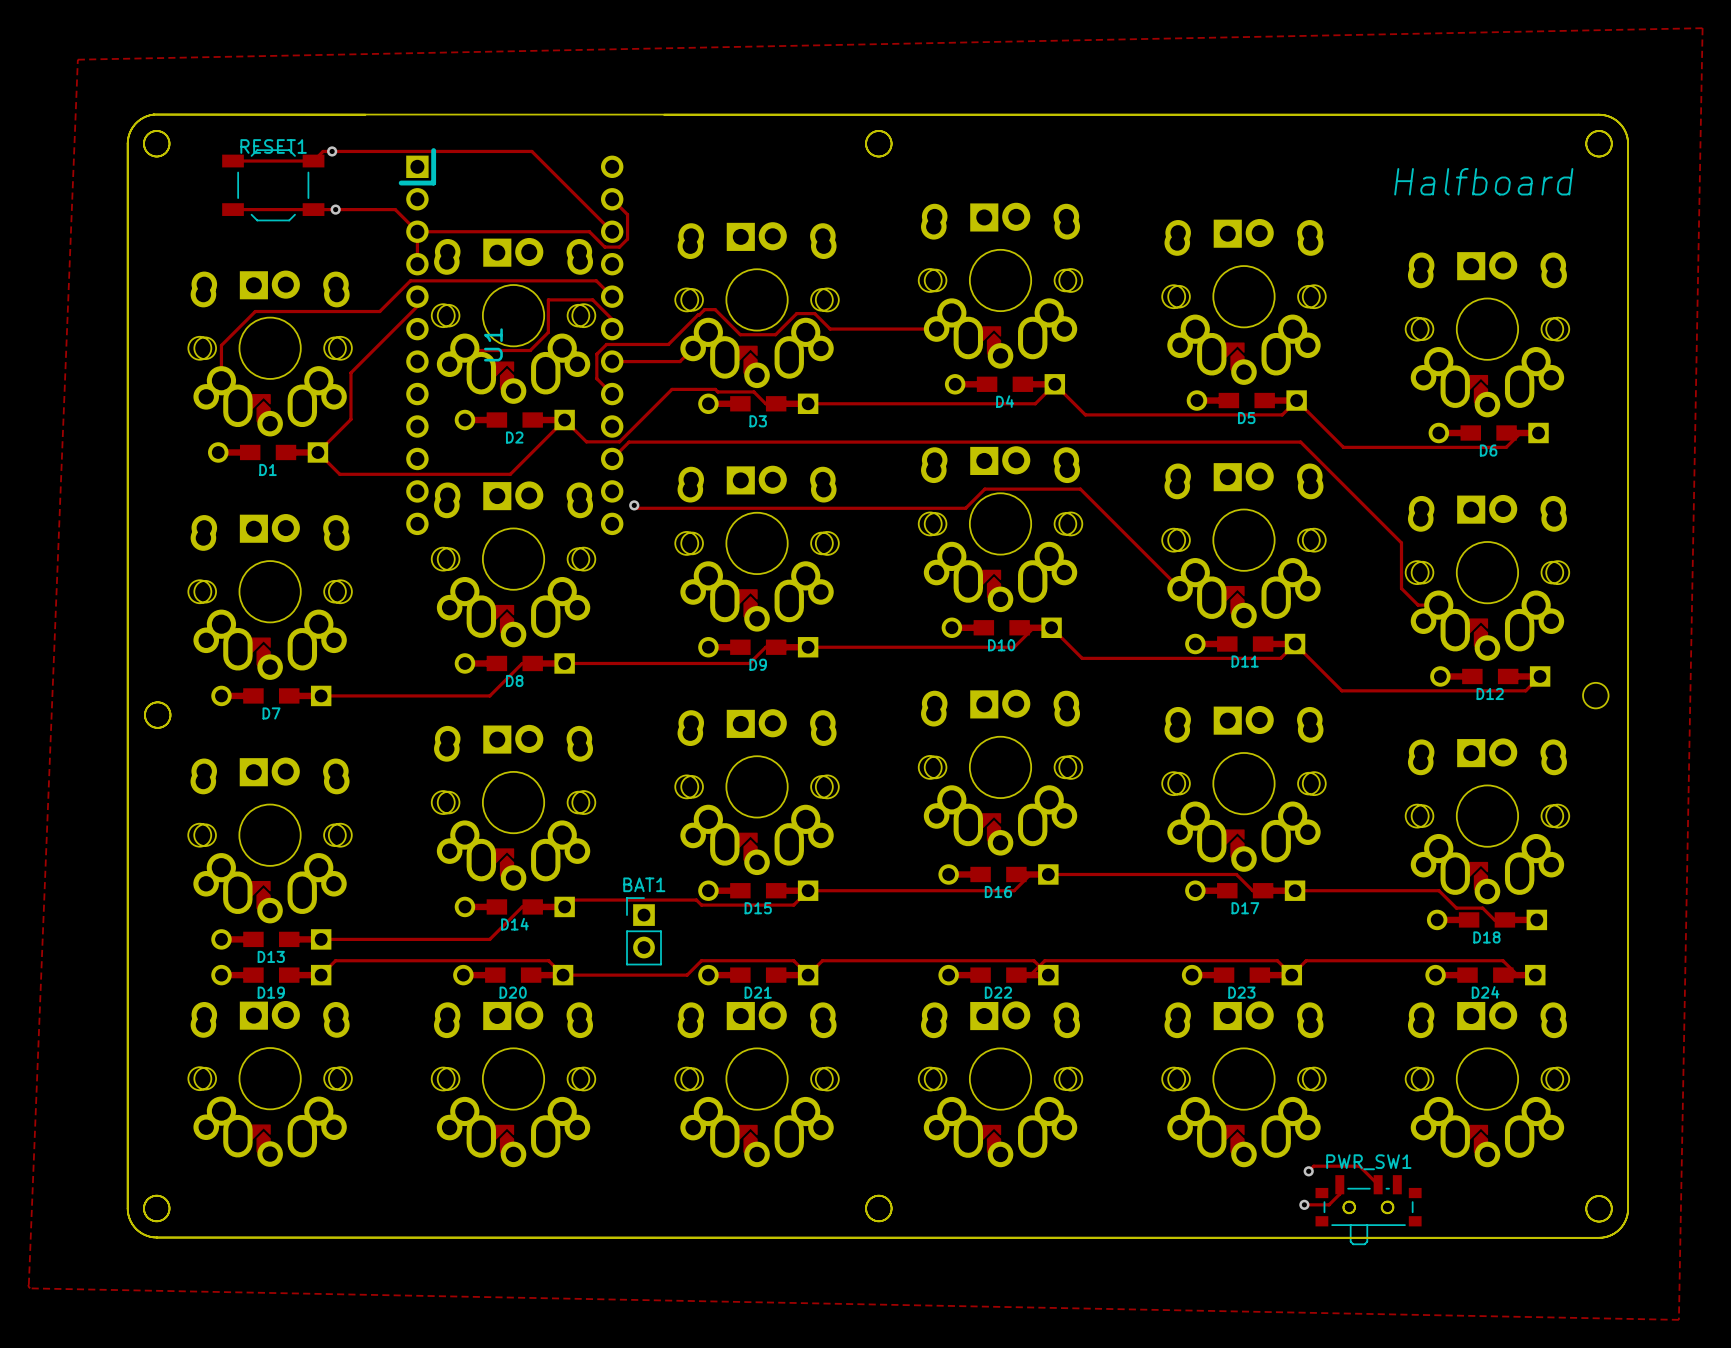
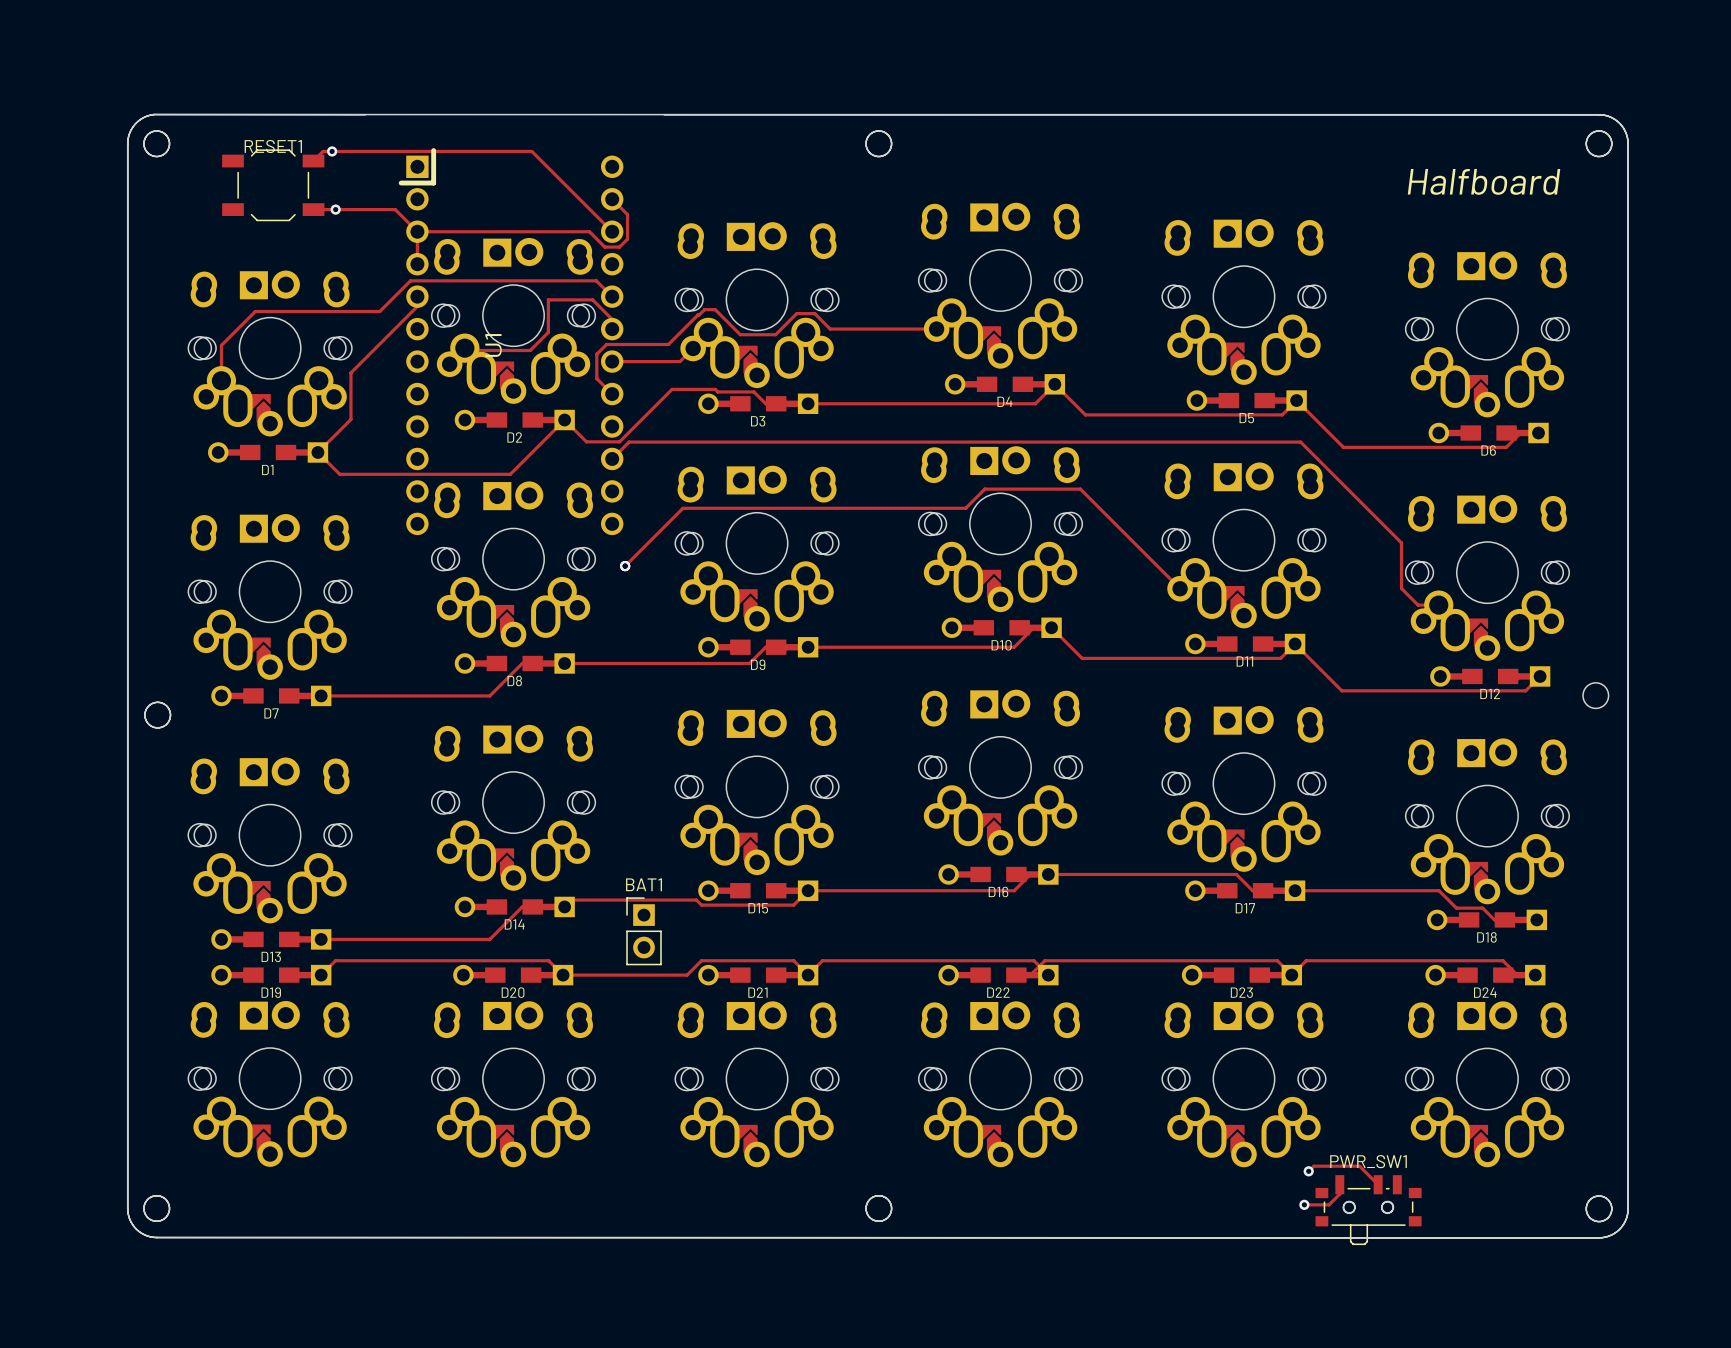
zone outline: (1702, 28) (77, 59) (28, 1286) (30, 1288) (1678, 1319) (1702, 28) -> none
track: (233, 161) (313, 161) -> none
track: (313, 209) (233, 209) (233, 211) -> none
track: (634, 505) (637, 508) (682, 508) -> (625, 566) (682, 508)
via position: (634, 505) -> (625, 566)

